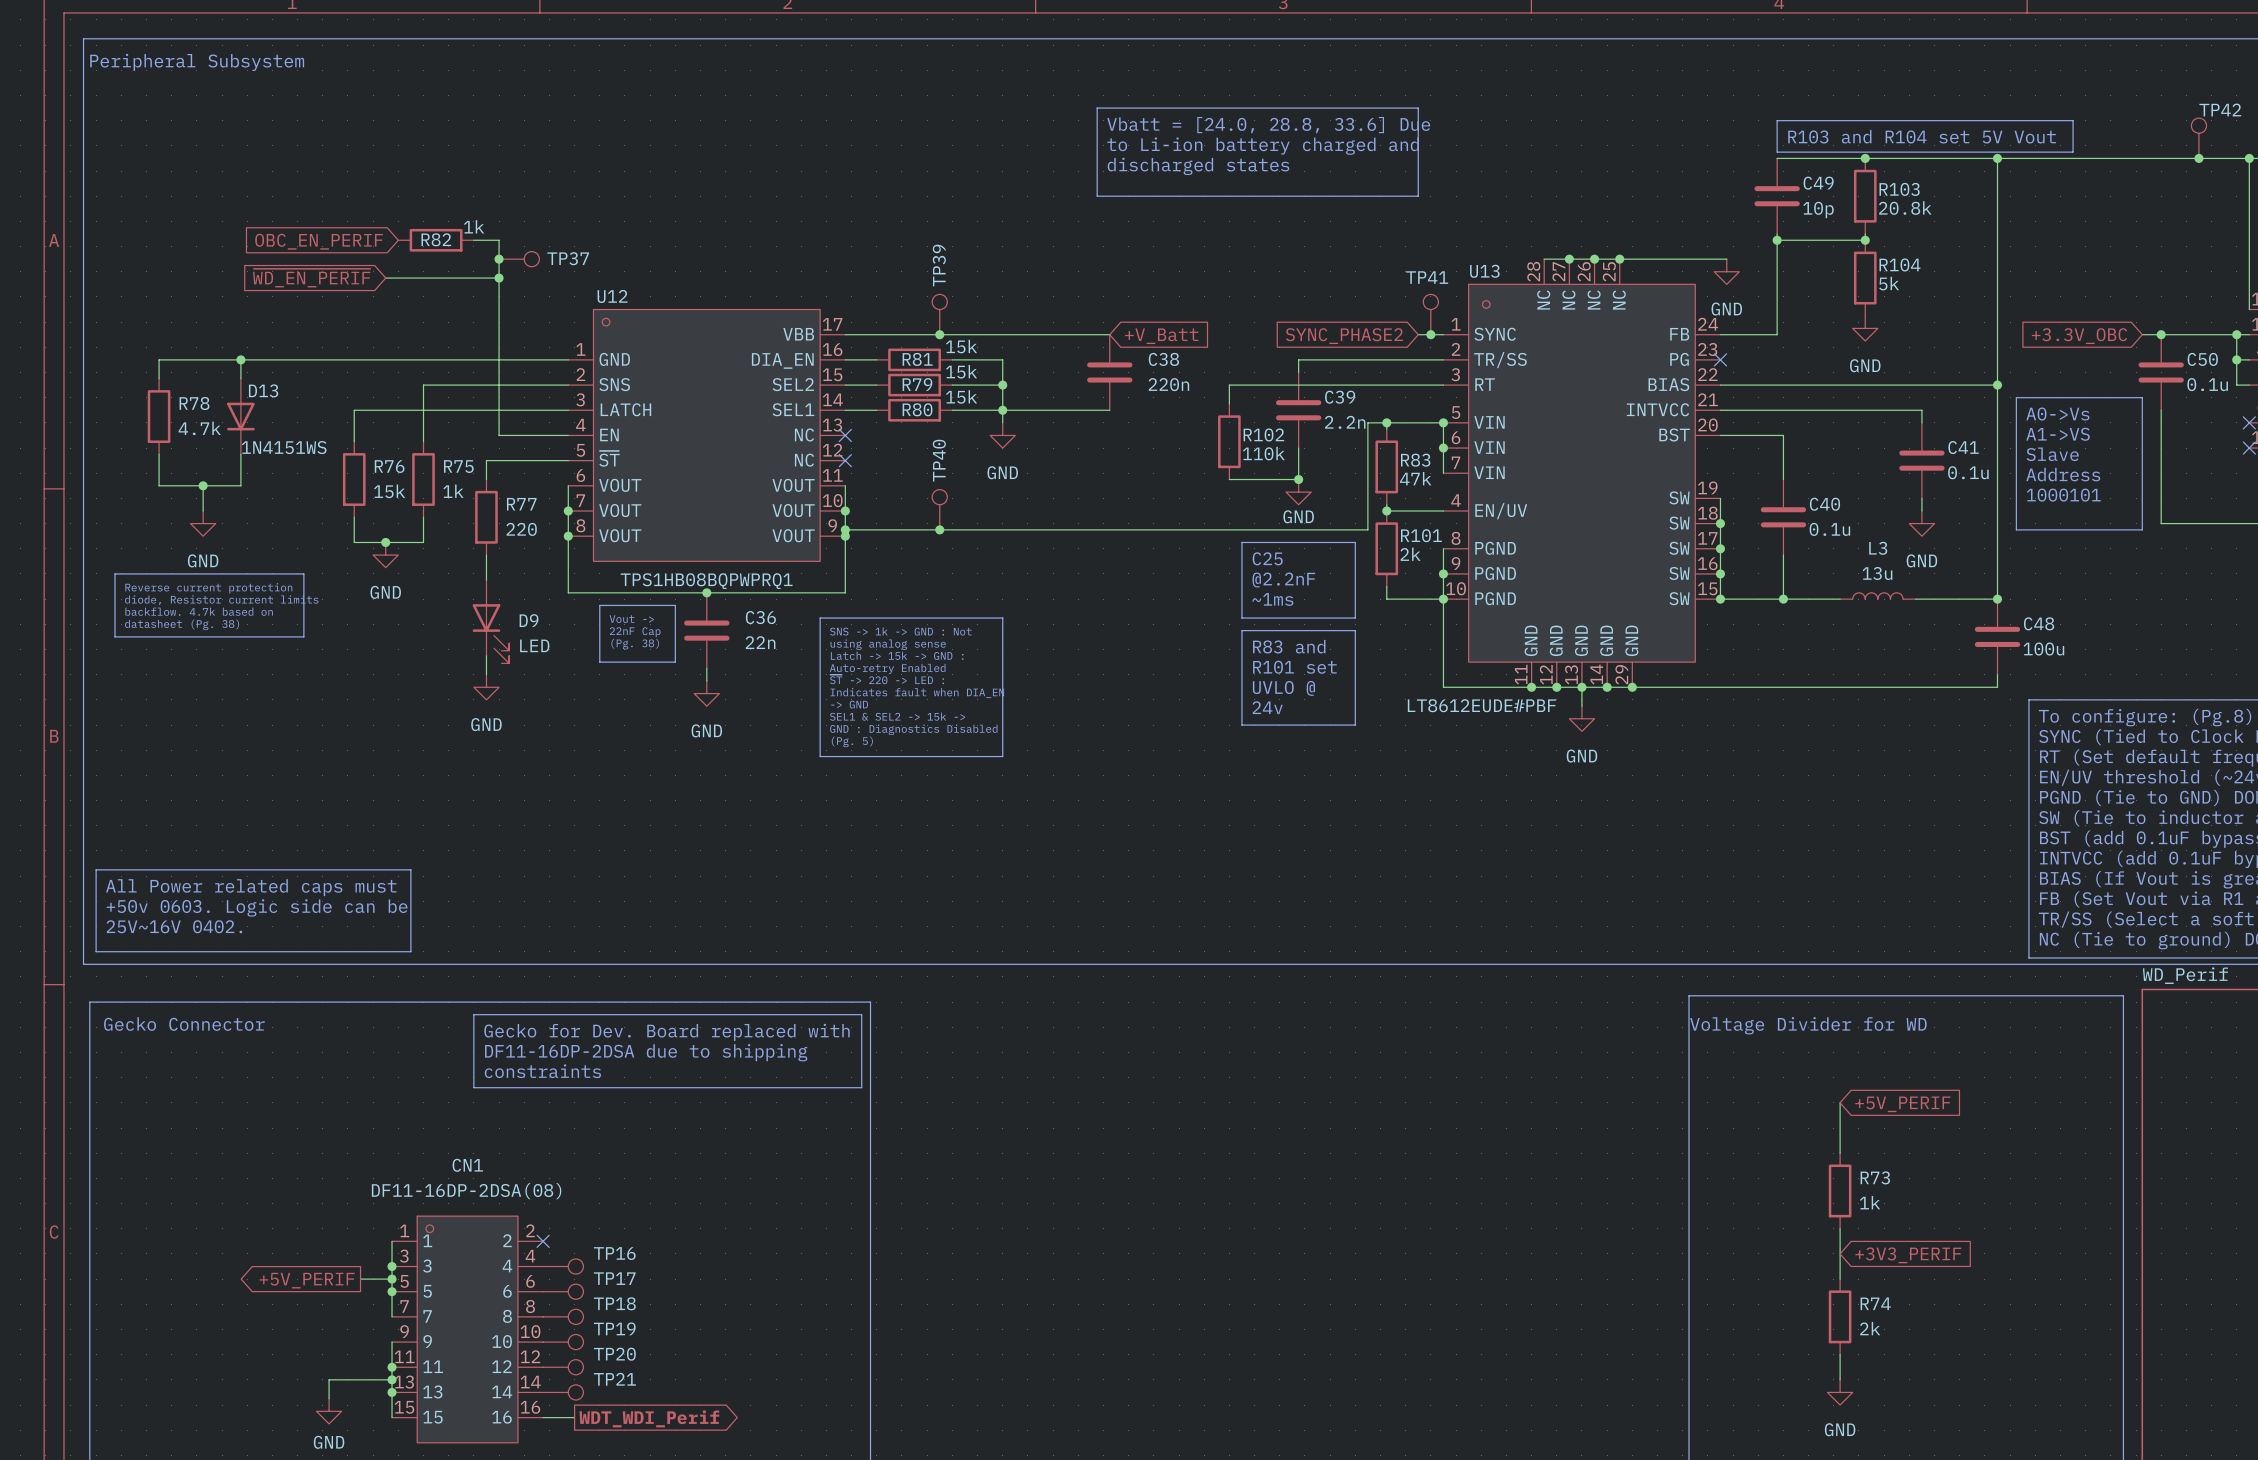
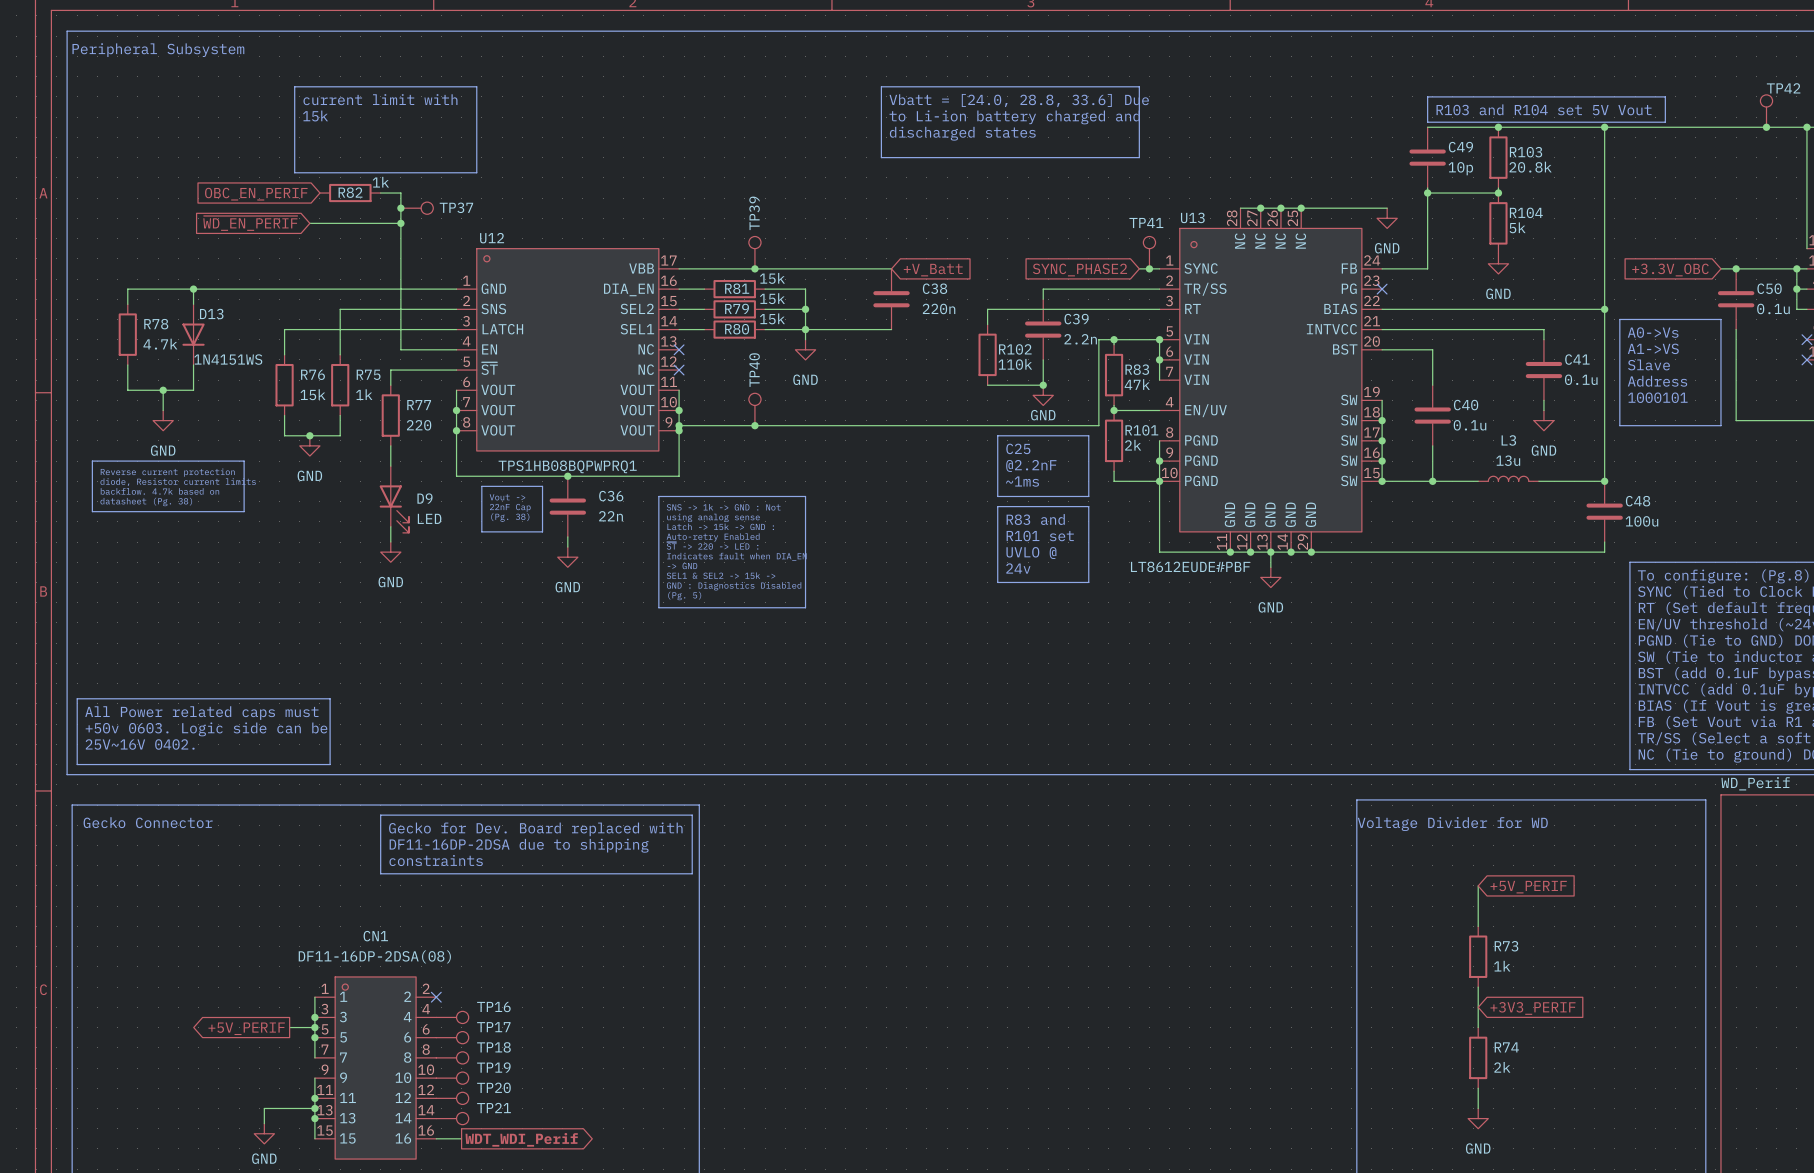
line: none -> (294, 86) (476, 86) (476, 172) (294, 172) (294, 86)
text: none -> current limit with (380, 99)
text: none -> 15k (315, 116)

